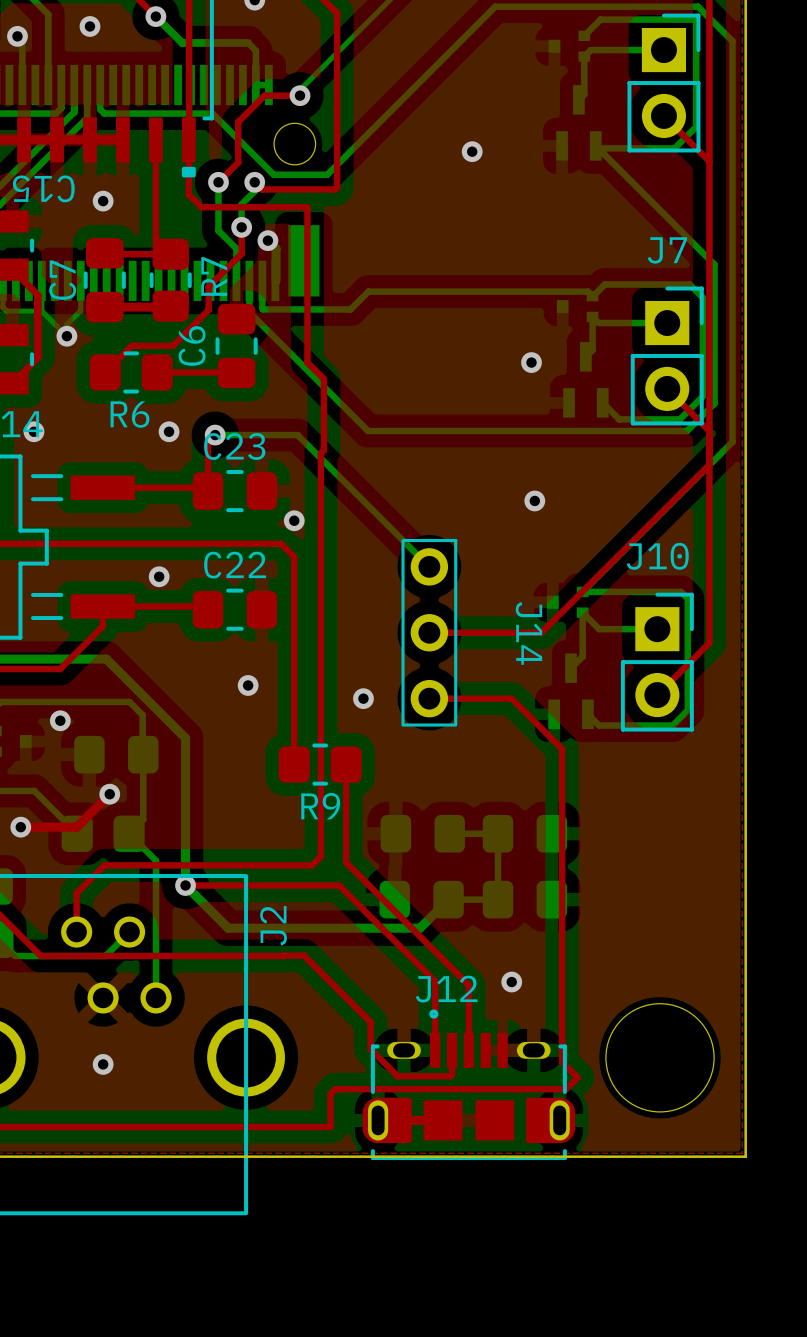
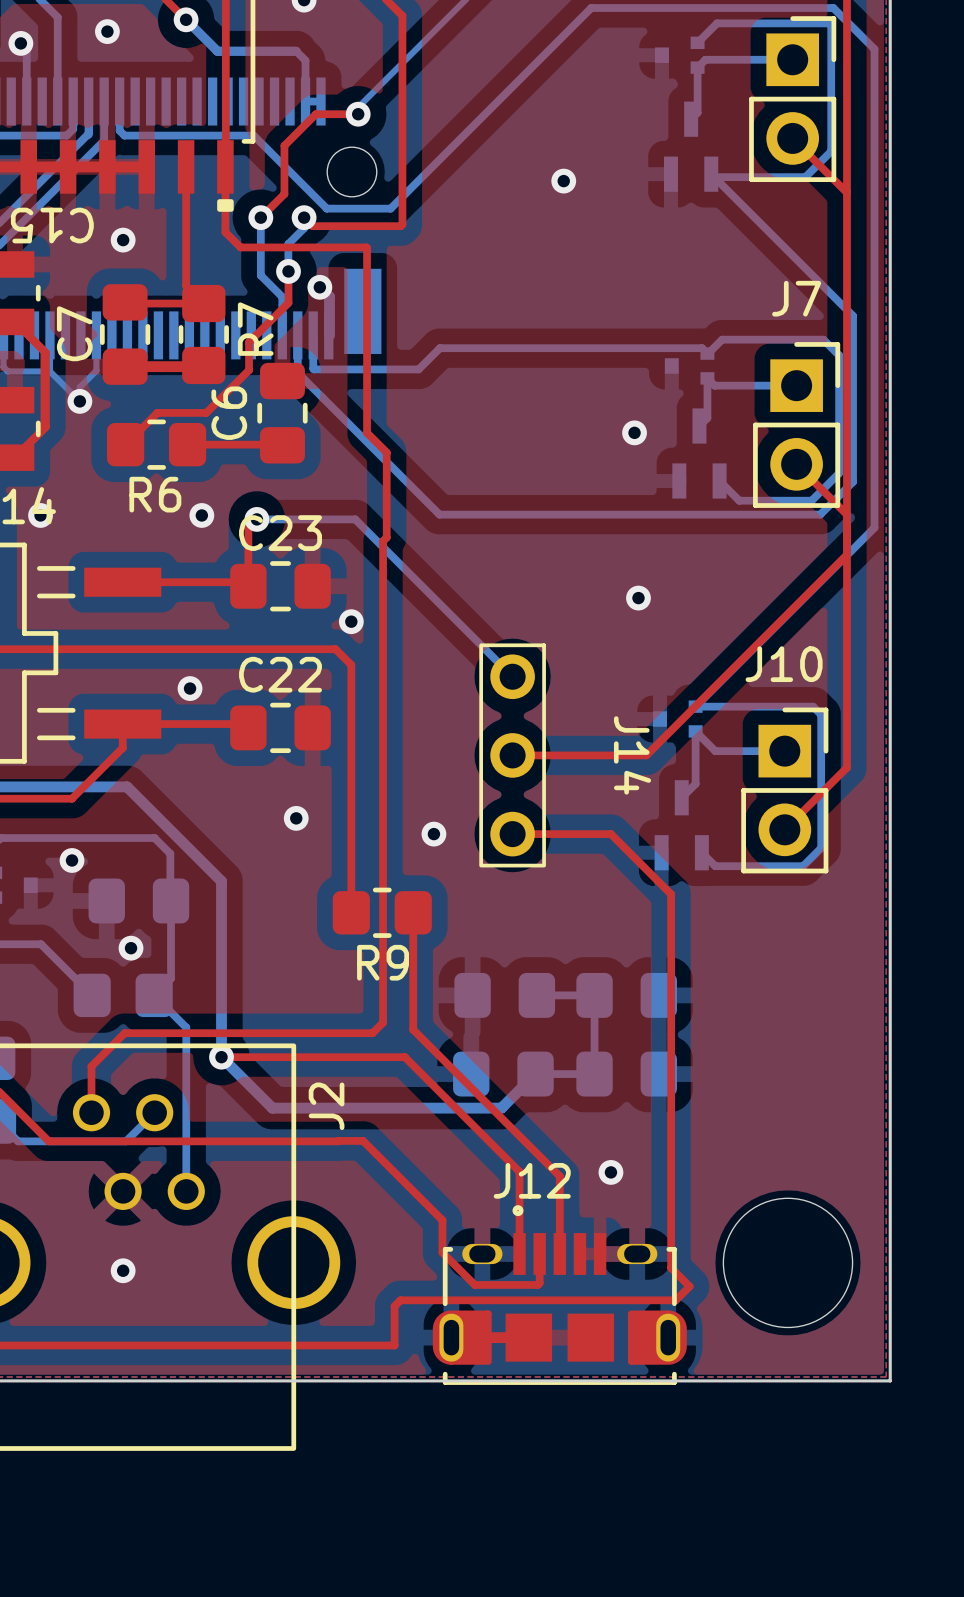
top track: (109, 794) (76, 827) (20, 827) -> none
via: (20, 827) -> none

